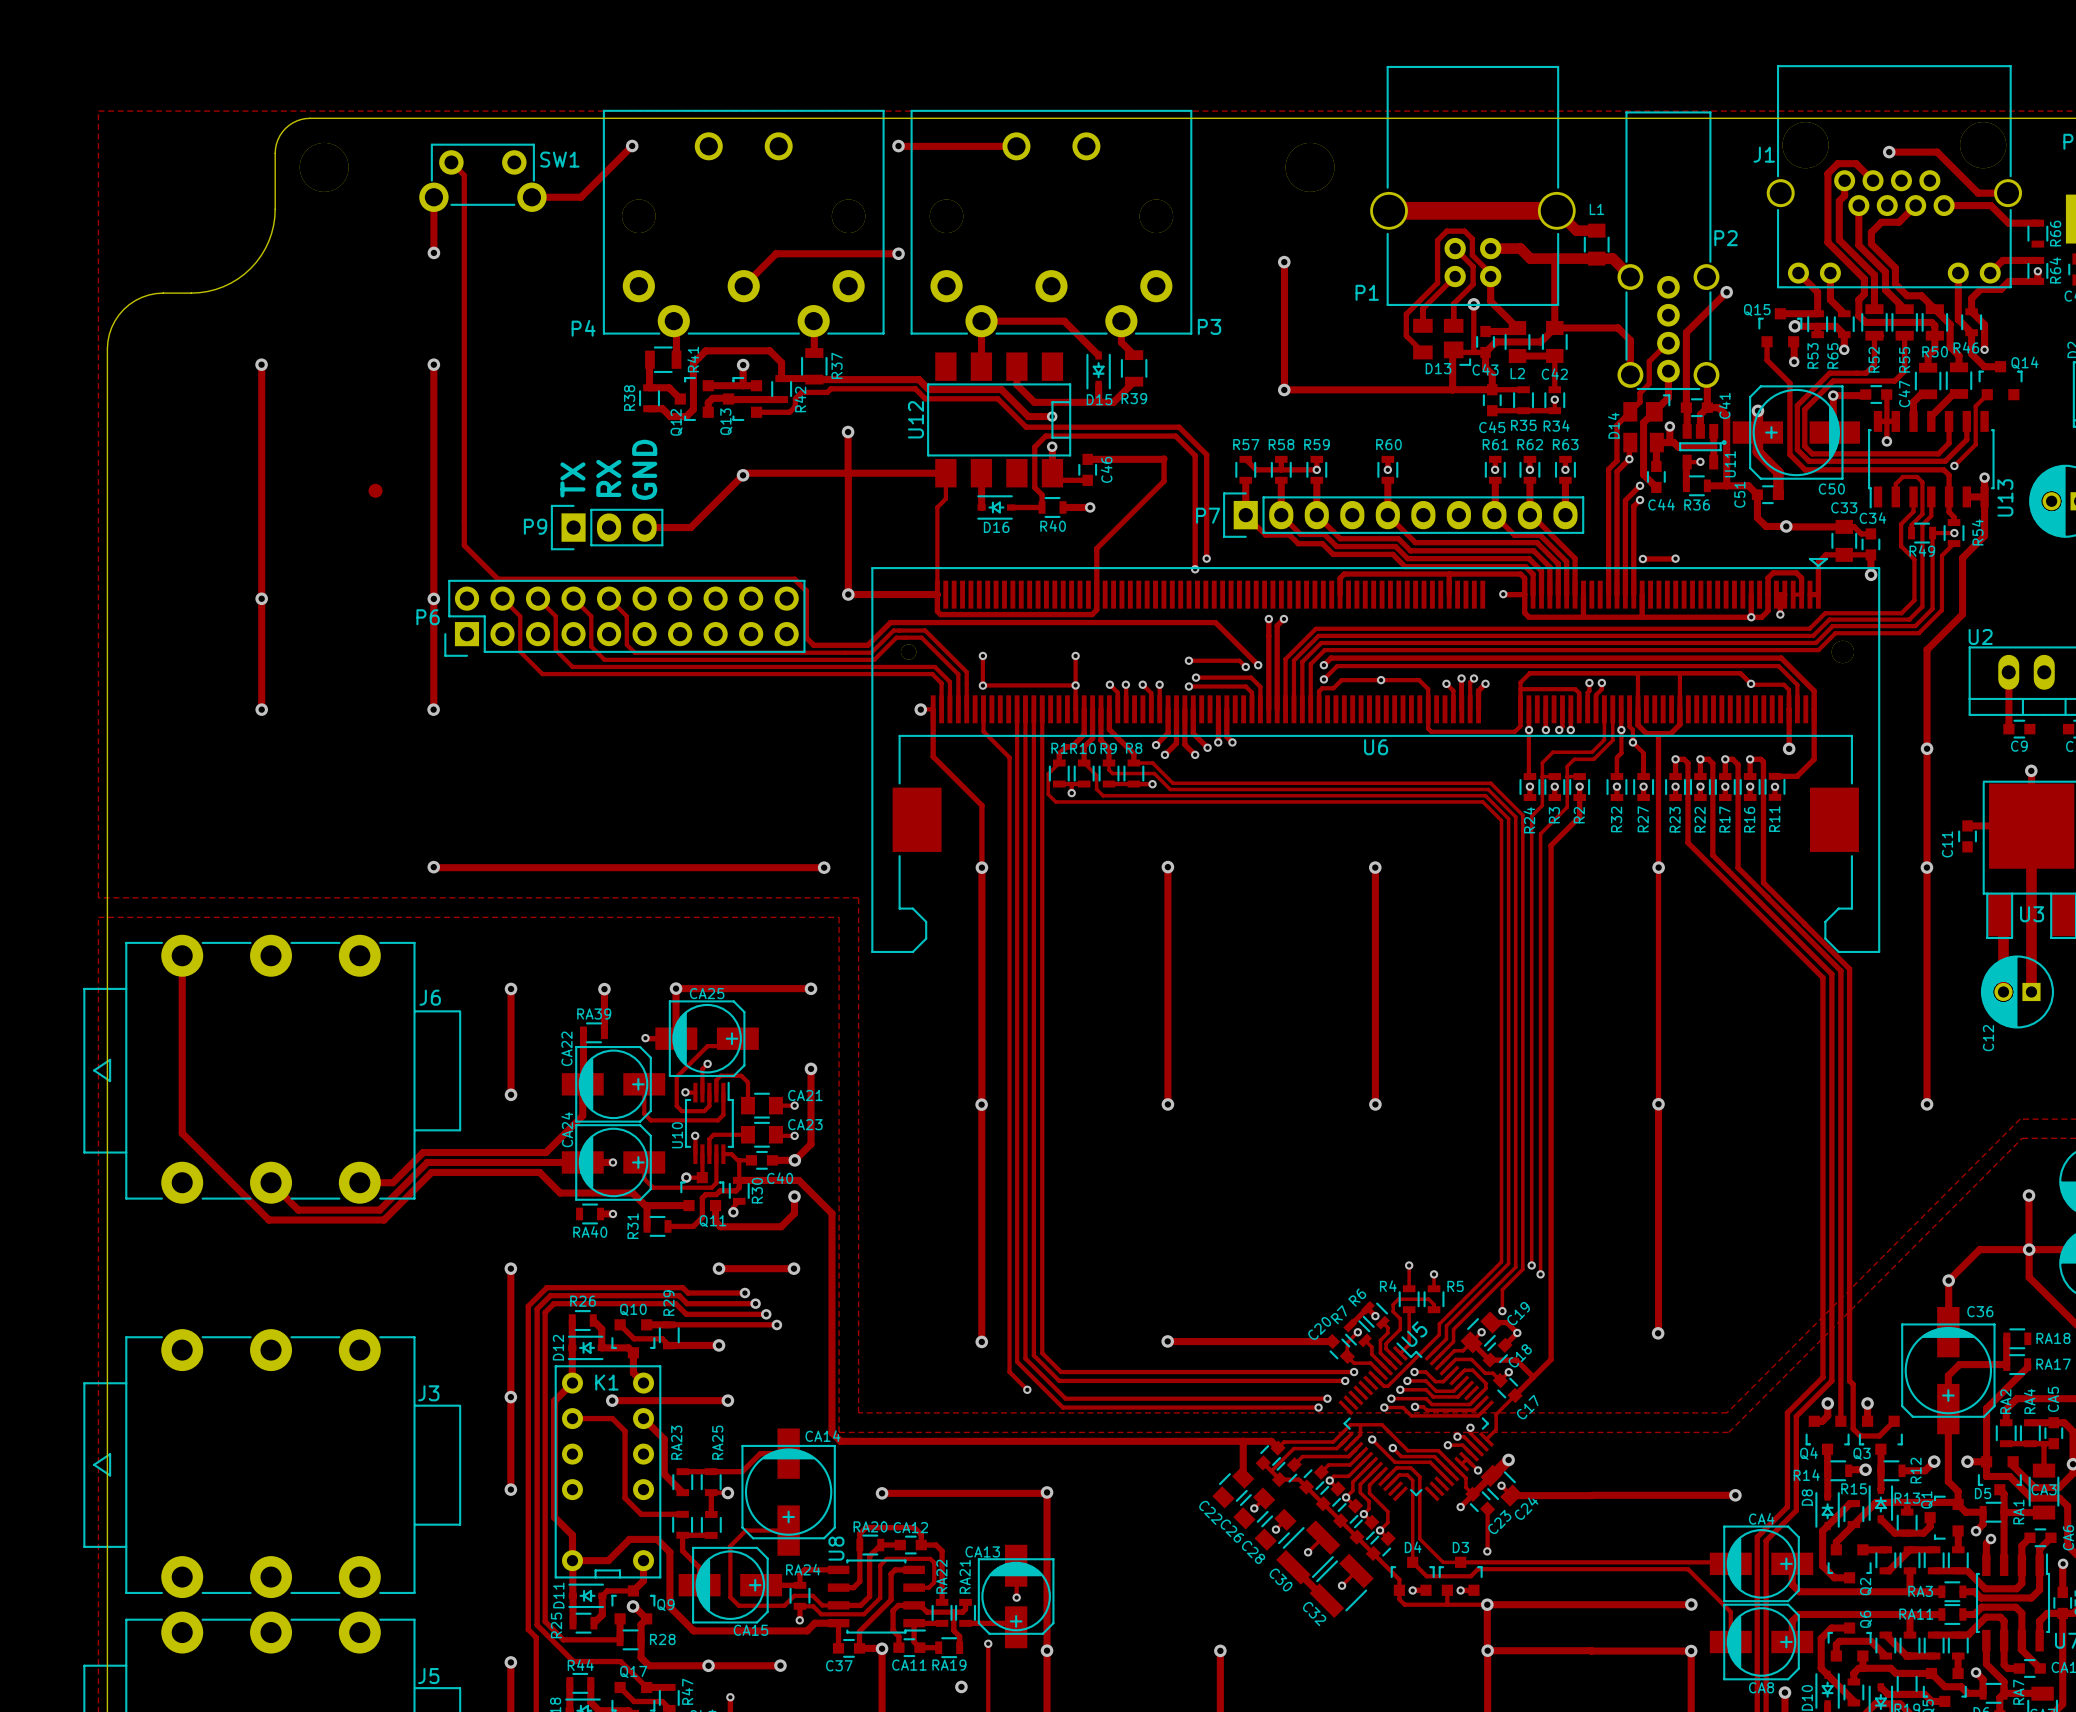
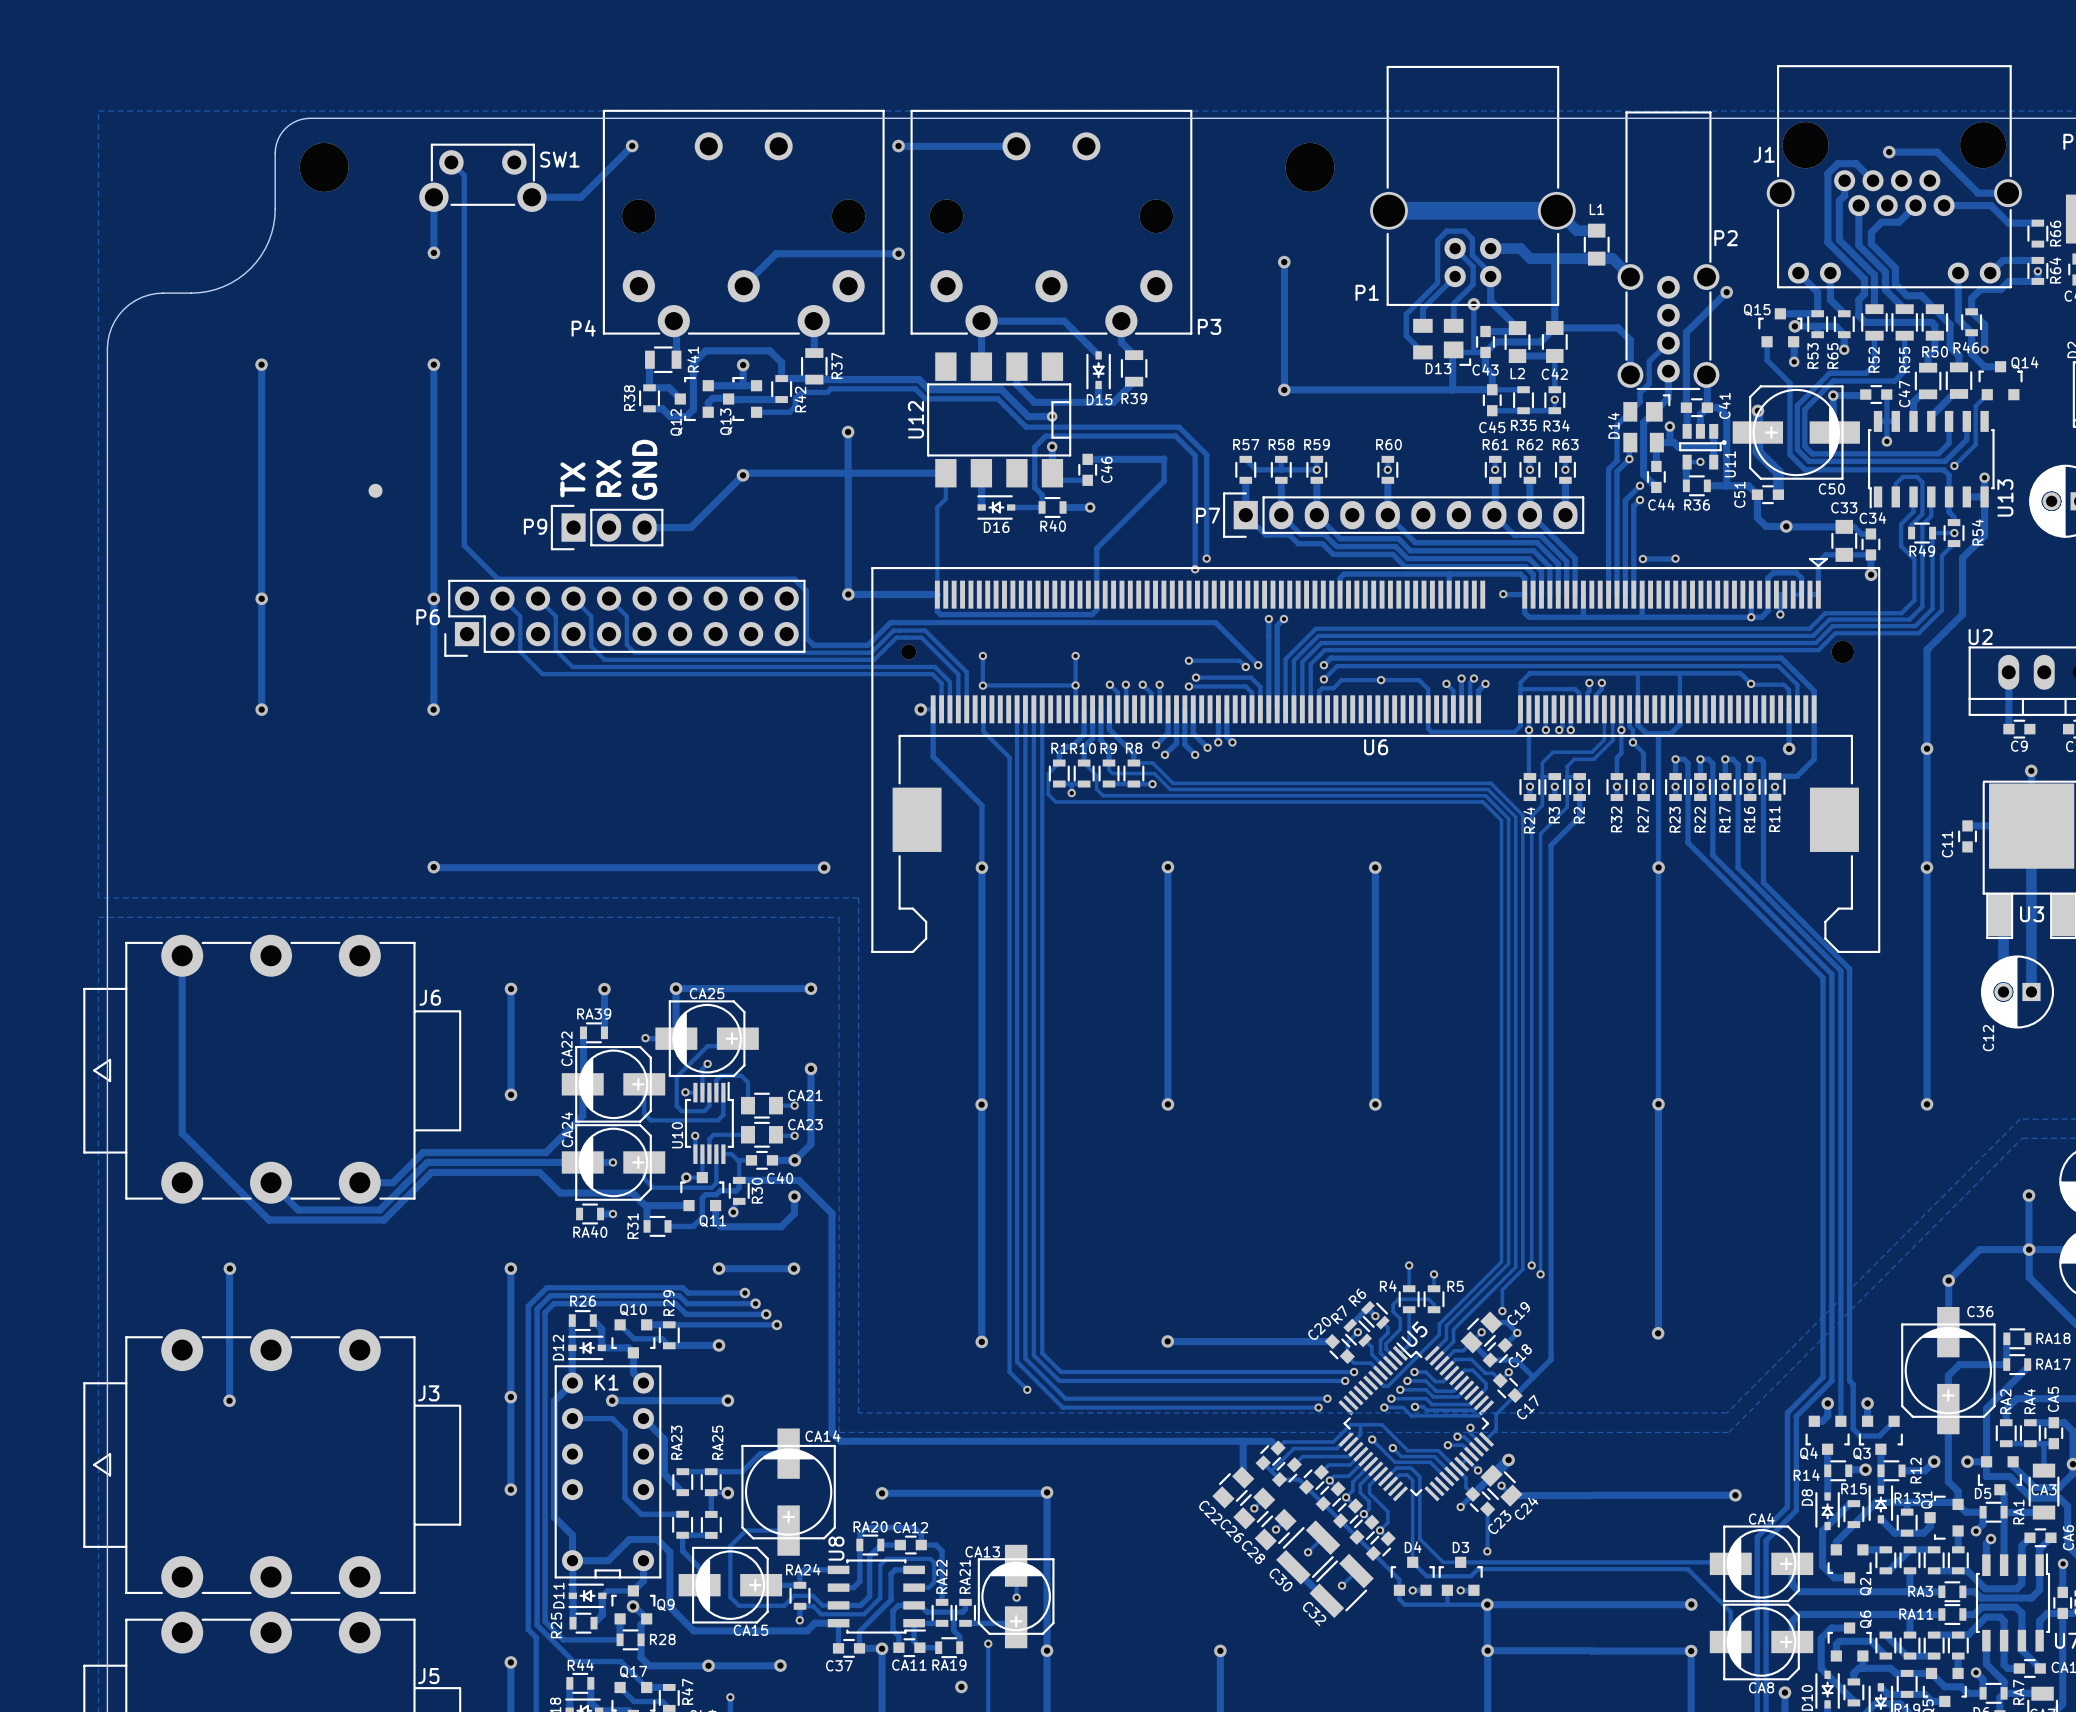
track: none -> (229, 1268) (229, 1400)
via: none -> (229, 1268)
via: none -> (229, 1400)

